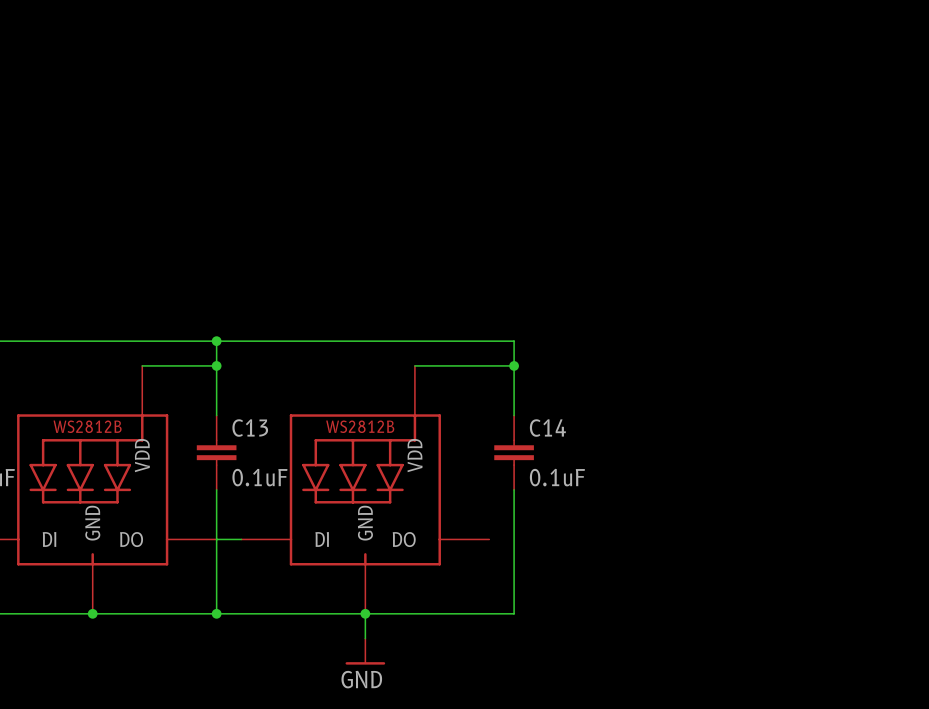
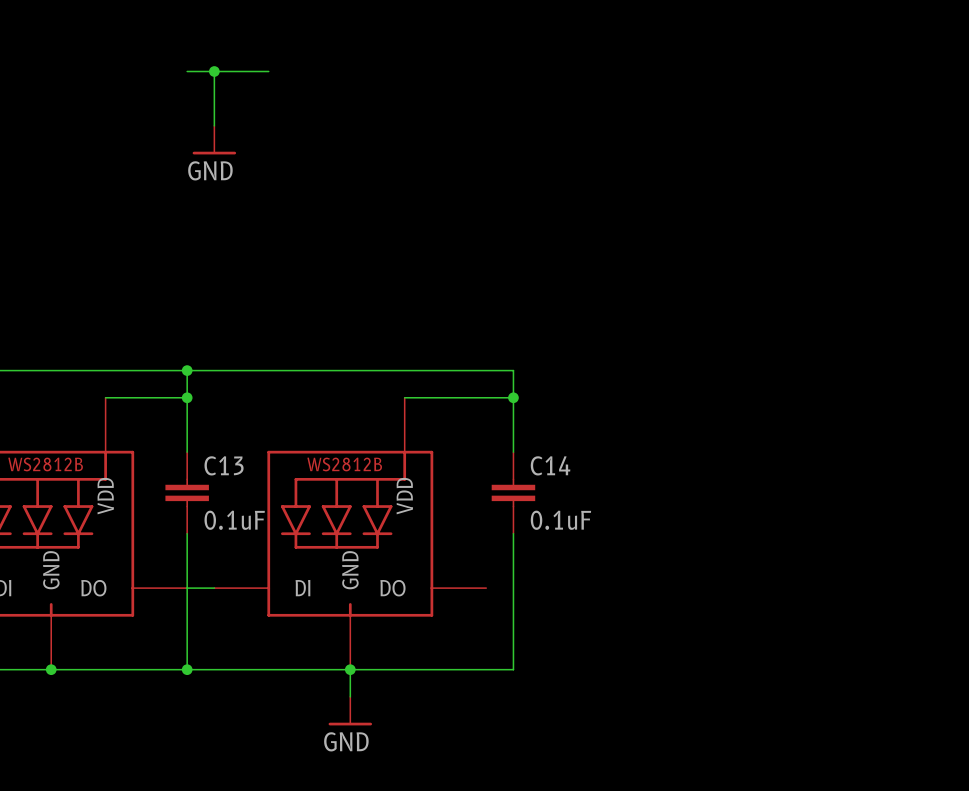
wire: none -> (187, 71) (268, 71)
wire: none -> (214, 71) (214, 125)
junction: none -> (214, 71)
power symbol: none -> GND (214, 140)

